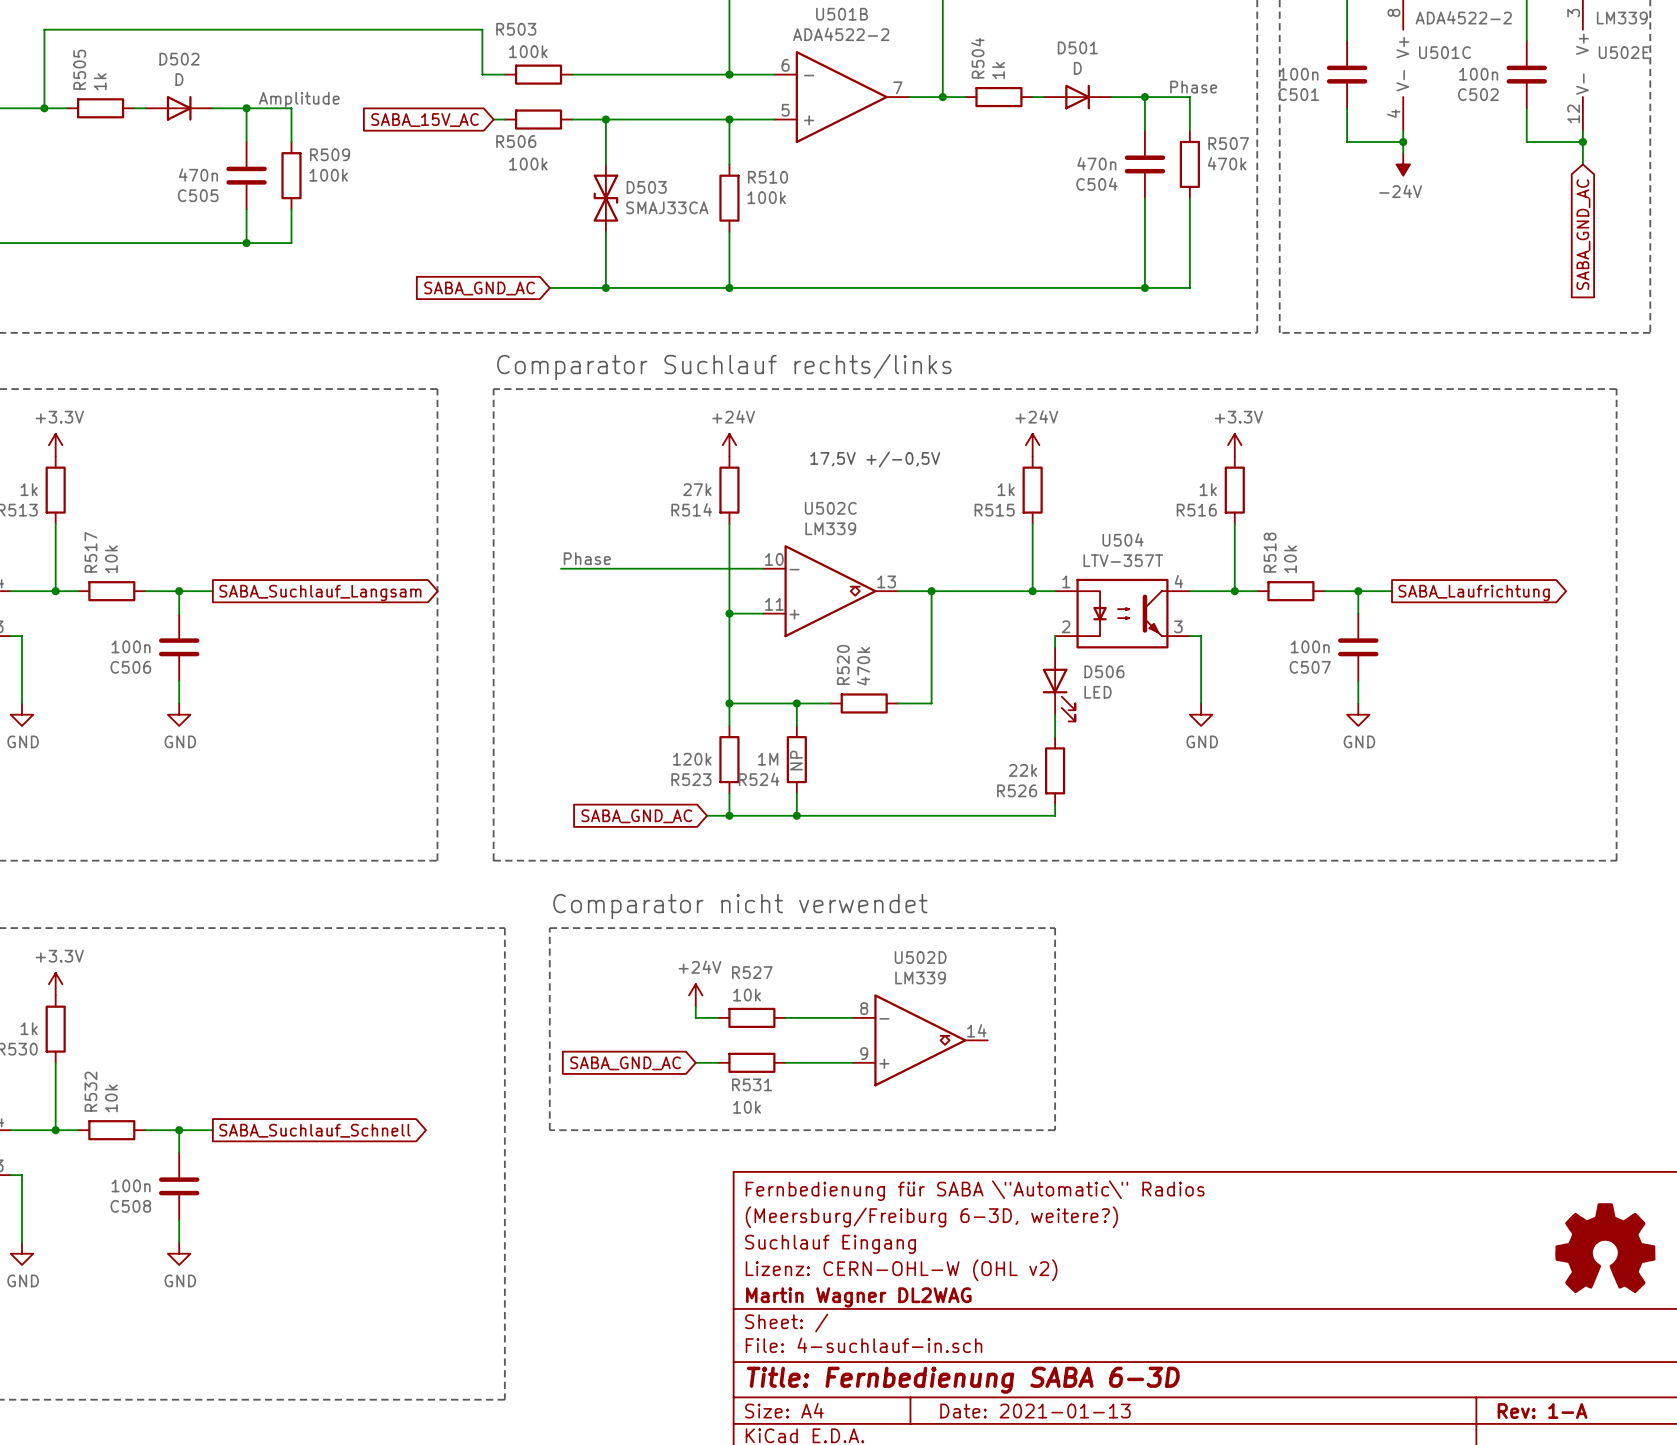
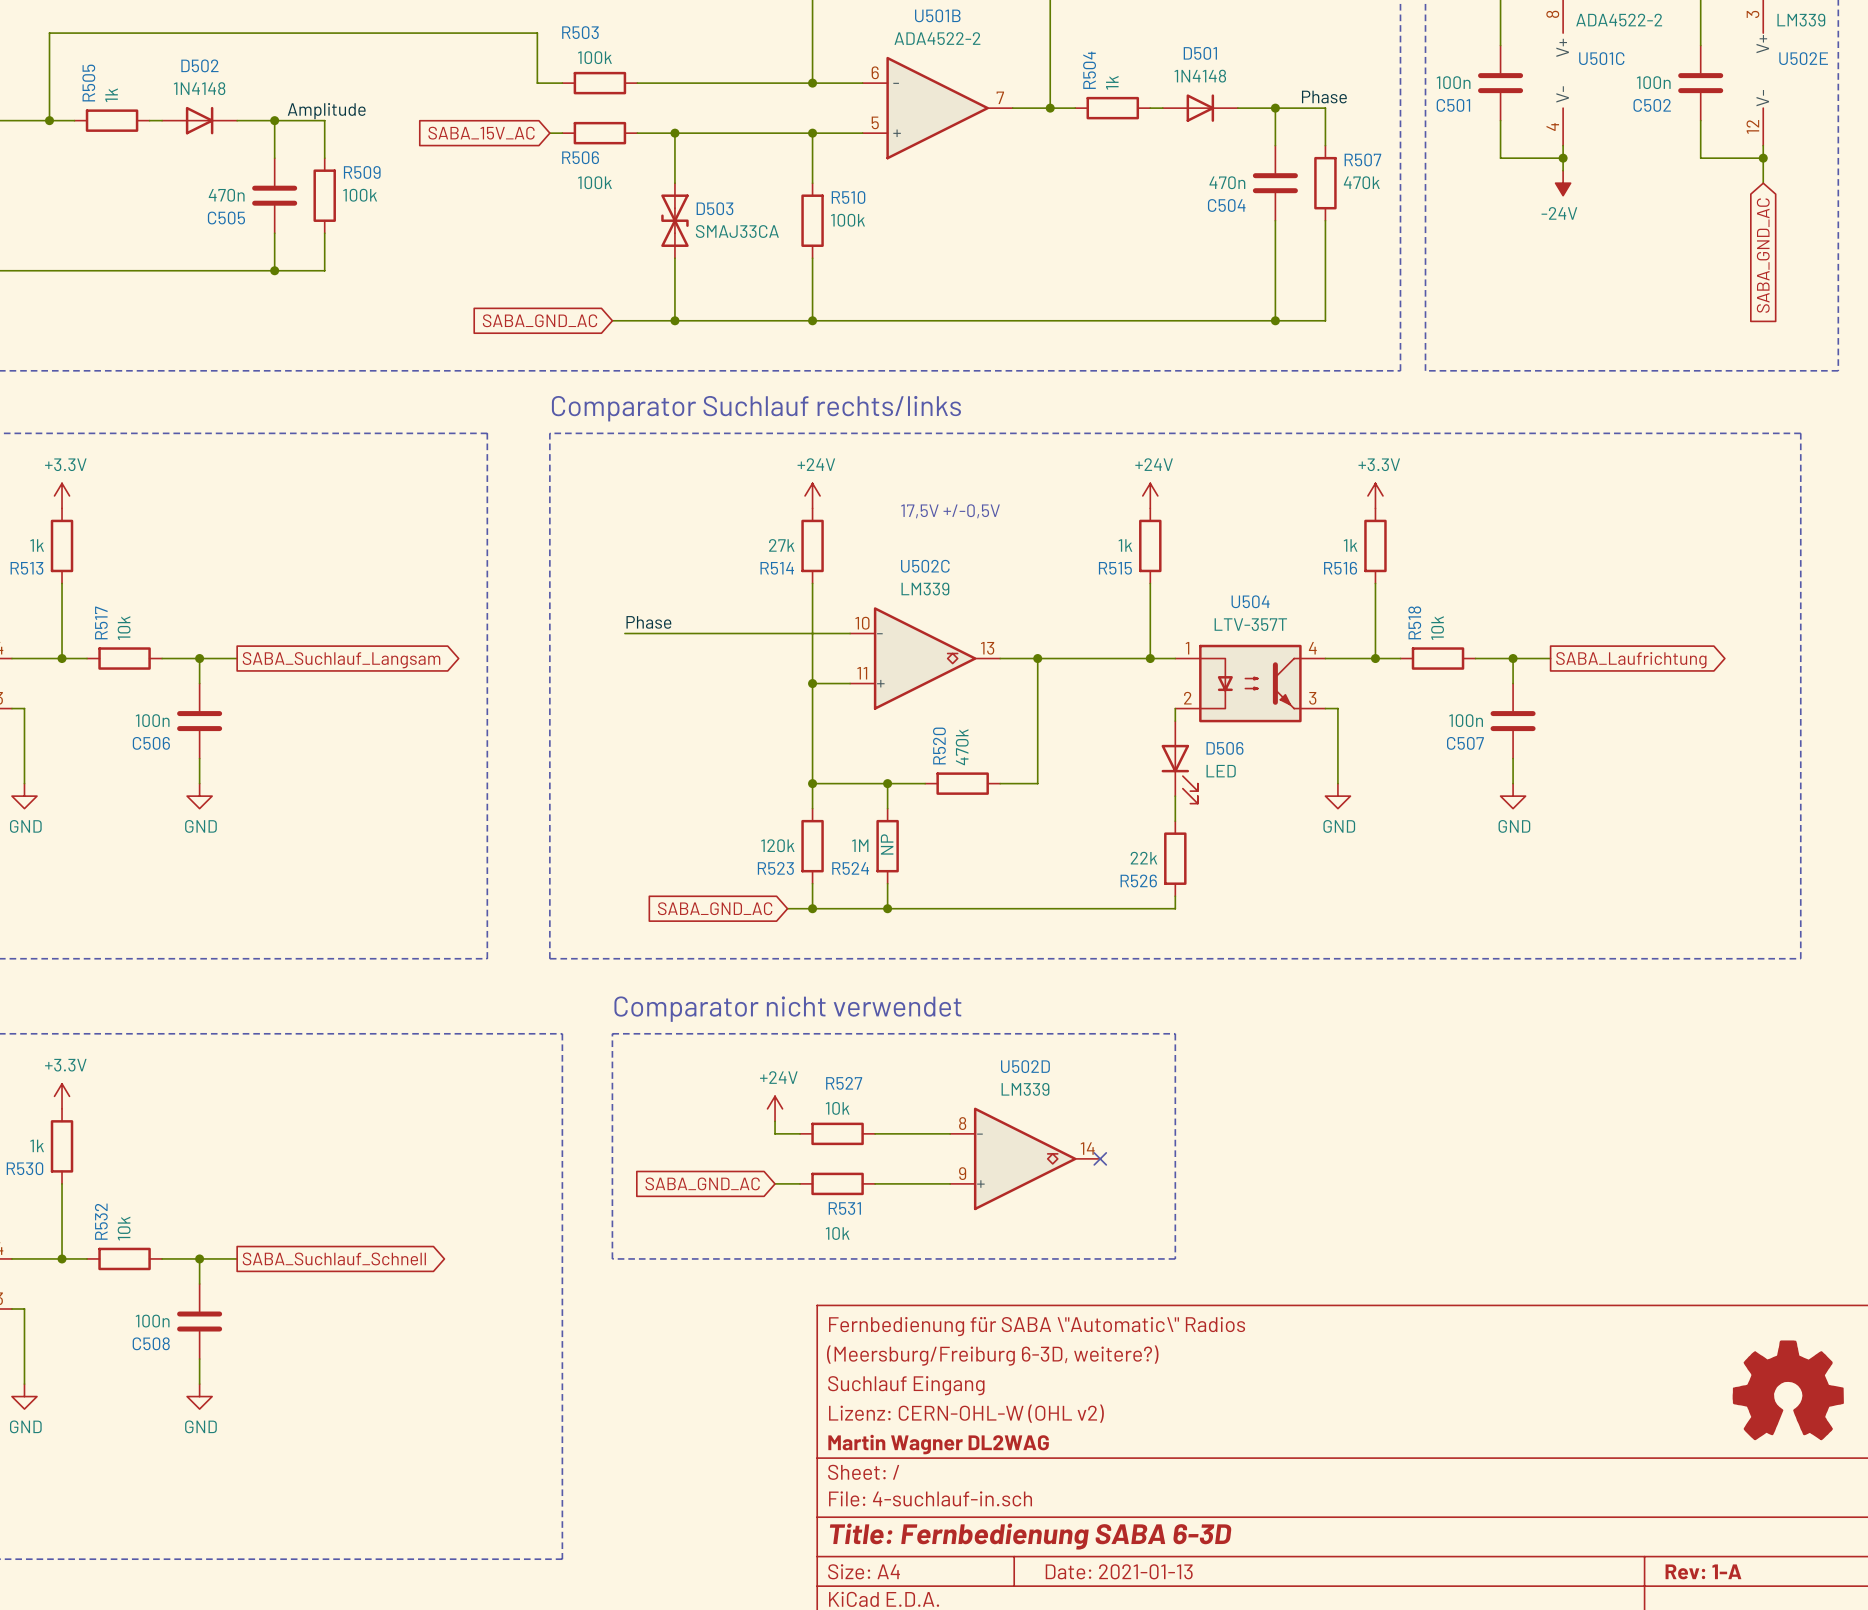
D501 value: D (1077, 68) -> 1N4148 (1200, 76)
D502 value: D (179, 79) -> 1N4148 (199, 88)
no-connect mark: none -> (1100, 1158)

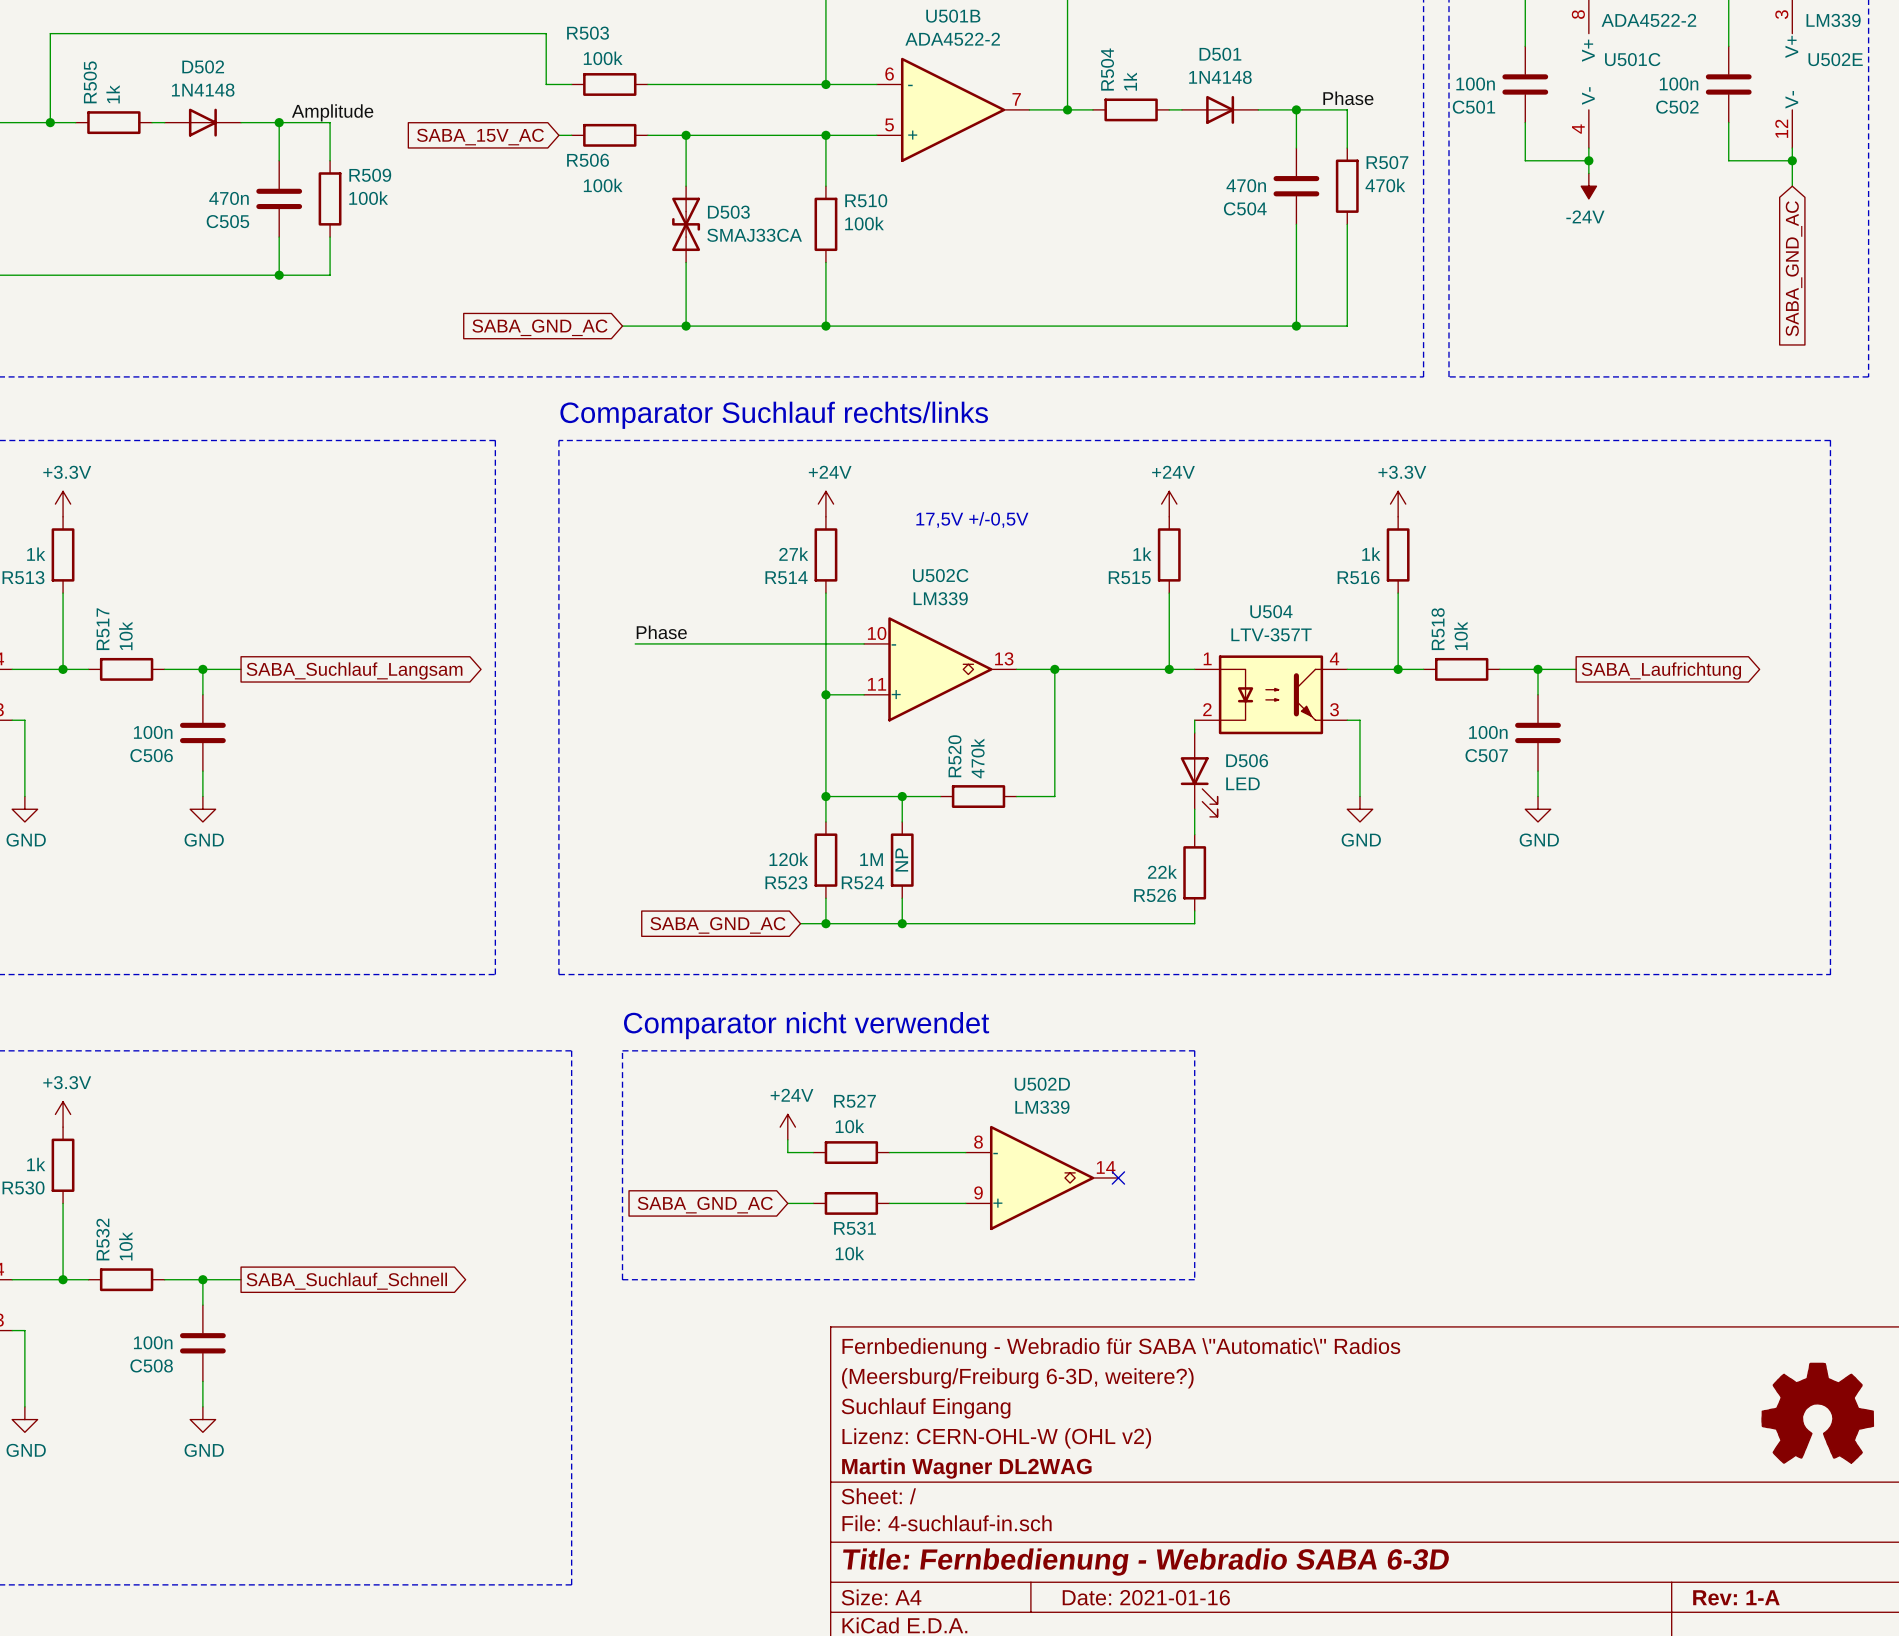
title block: Fernbedienung für SABA \"Automatic\" Radios (1037, 1326) -> Fernbedienung - Webradio für SABA \"Automatic\" Radios (1121, 1348)
title block: Title: Fernbedienung SABA 6-3D (1030, 1536) -> Title: Fernbedienung - Webradio SABA 6-3D (1146, 1562)
title block: Date: 2021-01-13 (1119, 1571) -> Date: 2021-01-16 (1146, 1597)

